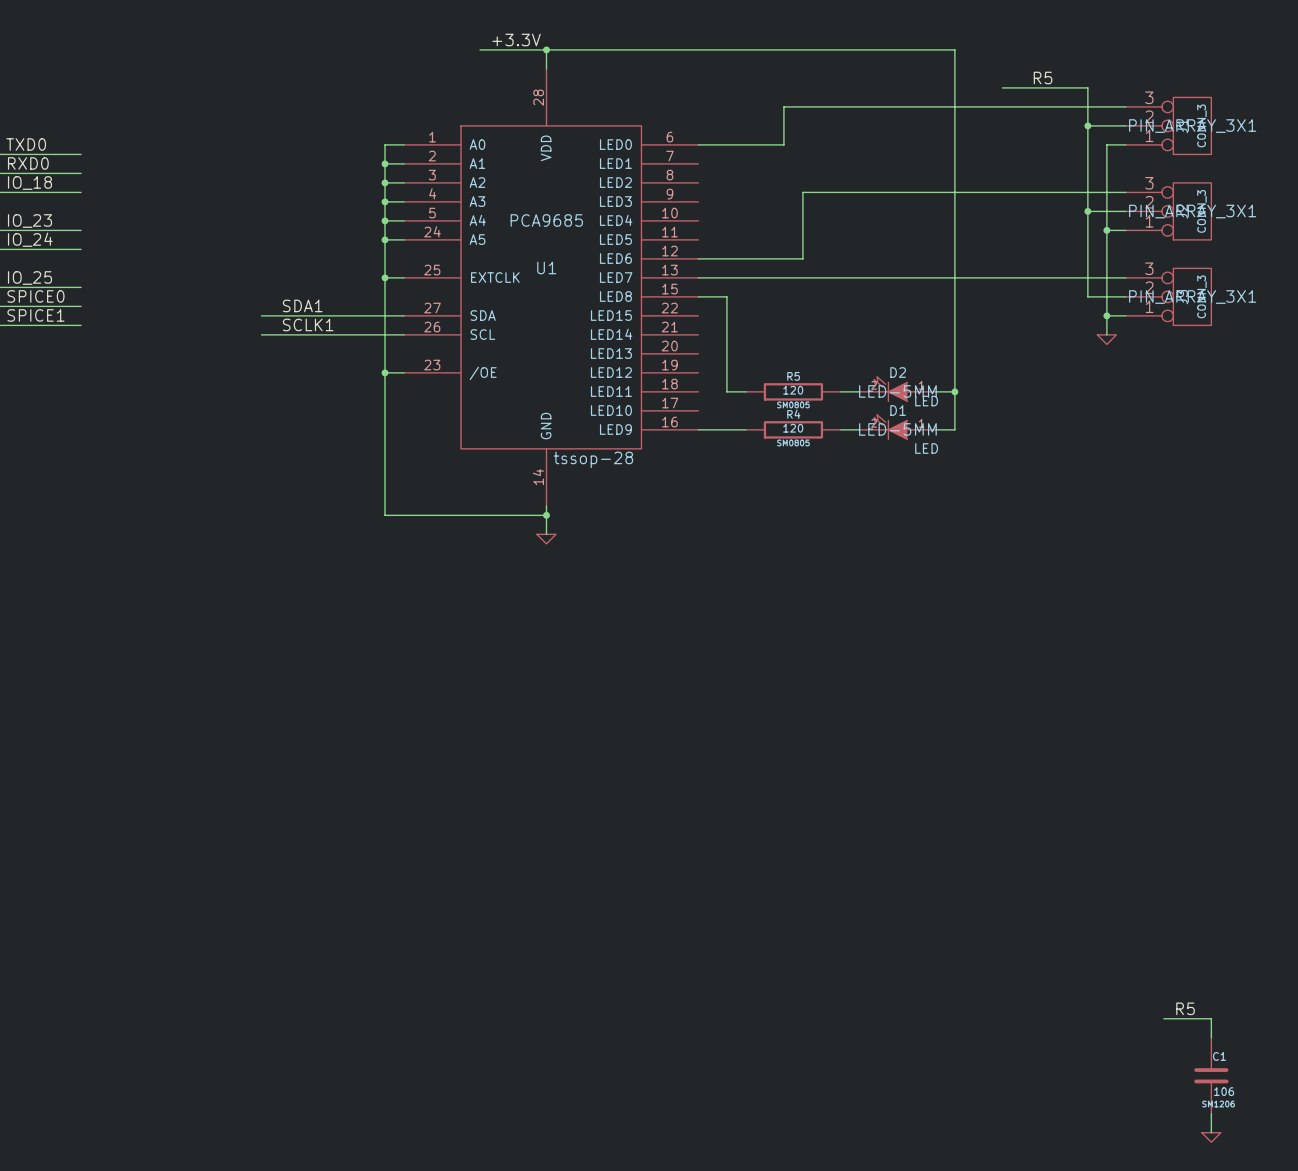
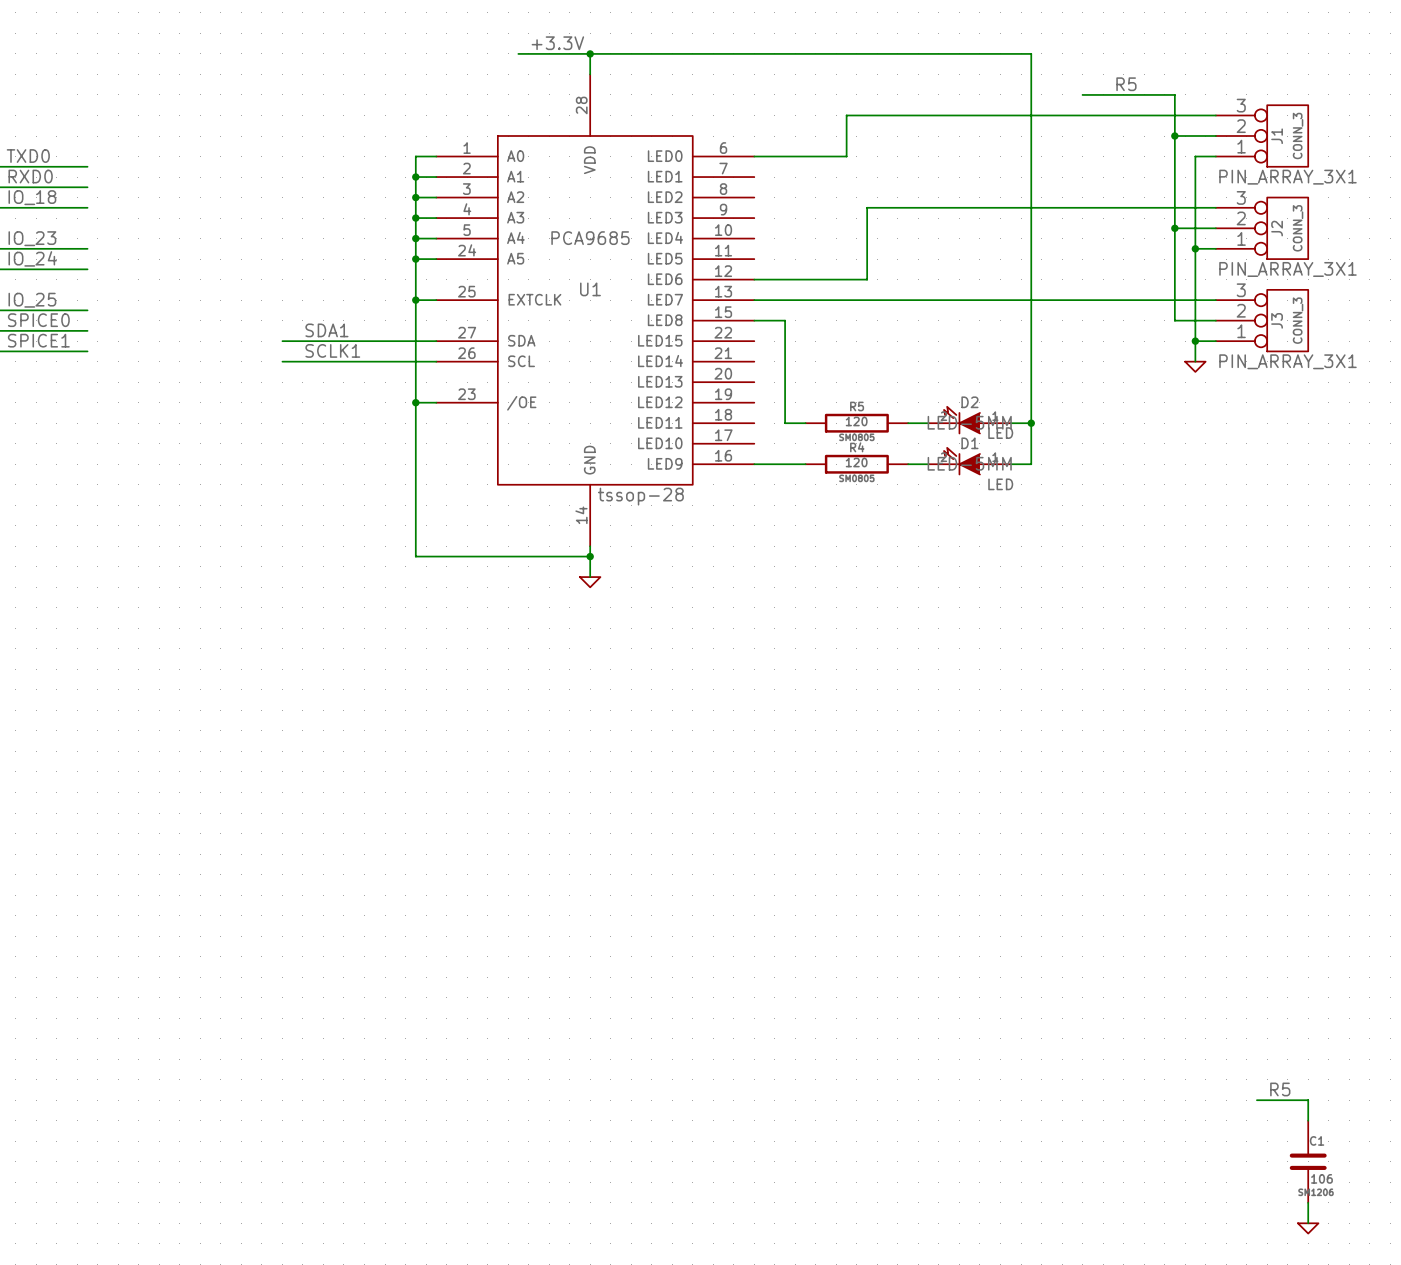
J1 text position: PIN_ARRAY_3X1 (1192, 126) -> PIN_ARRAY_3X1 (1287, 177)
J2 text position: PIN_ARRAY_3X1 (1192, 211) -> PIN_ARRAY_3X1 (1287, 269)
J3 text position: PIN_ARRAY_3X1 (1192, 297) -> PIN_ARRAY_3X1 (1287, 361)

